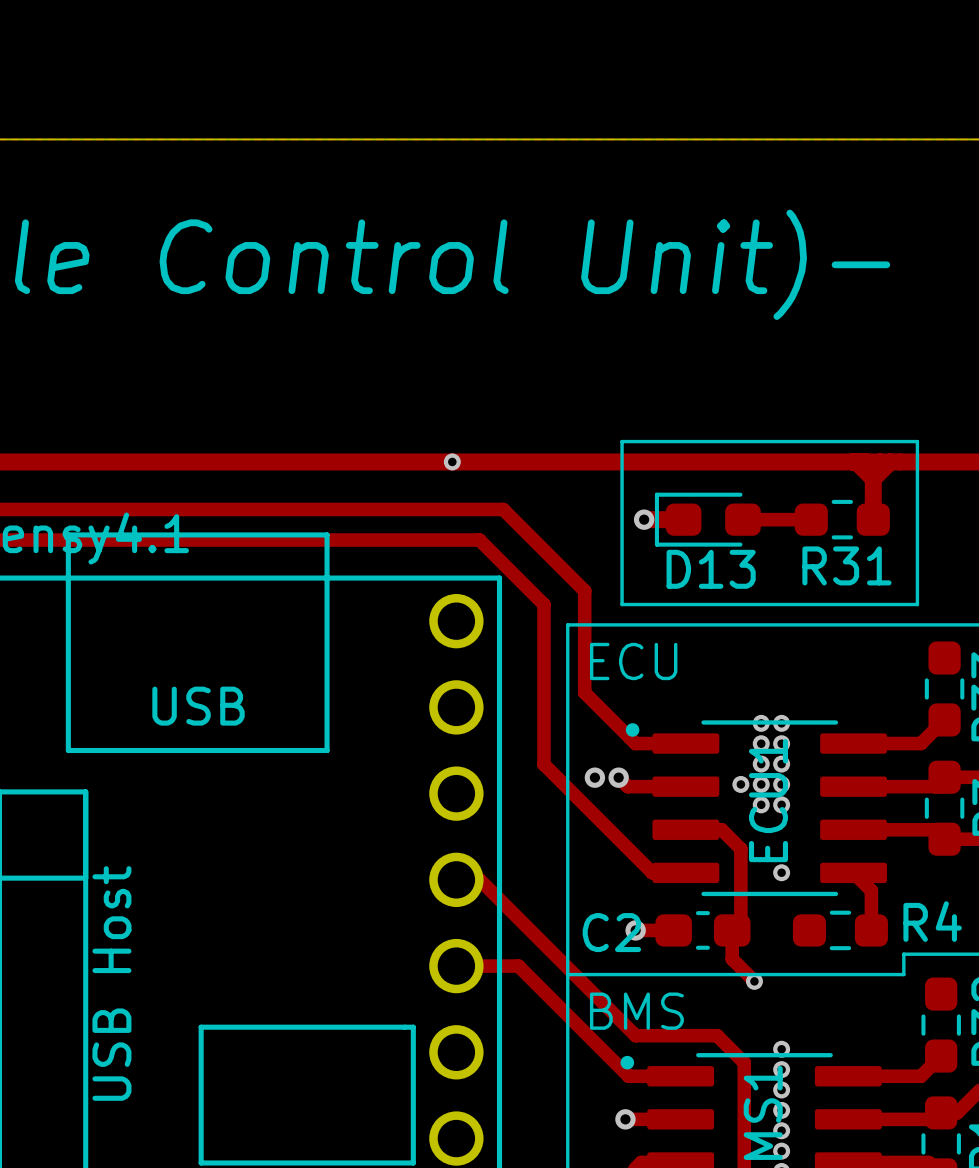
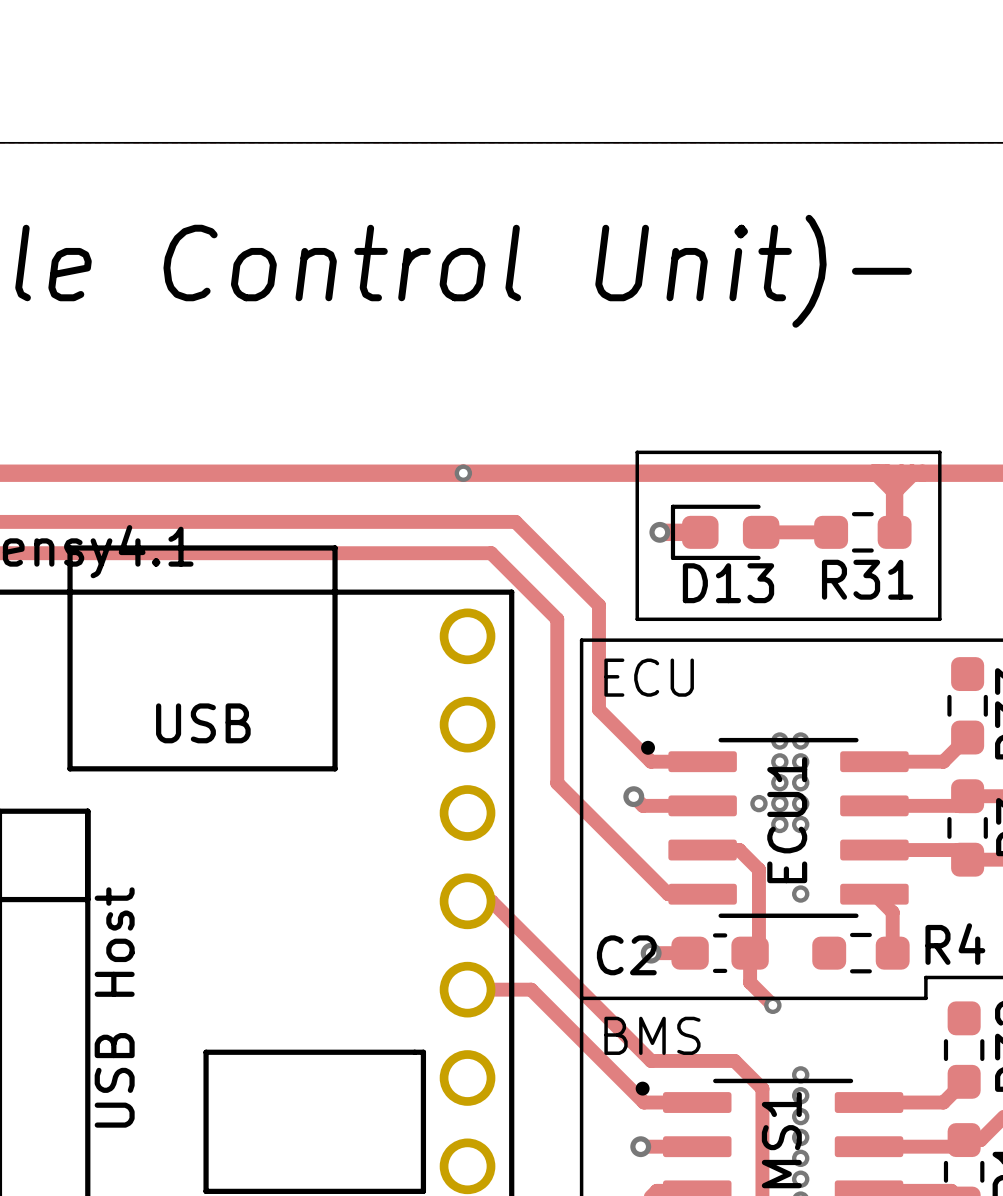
via: (594, 777) -> none

